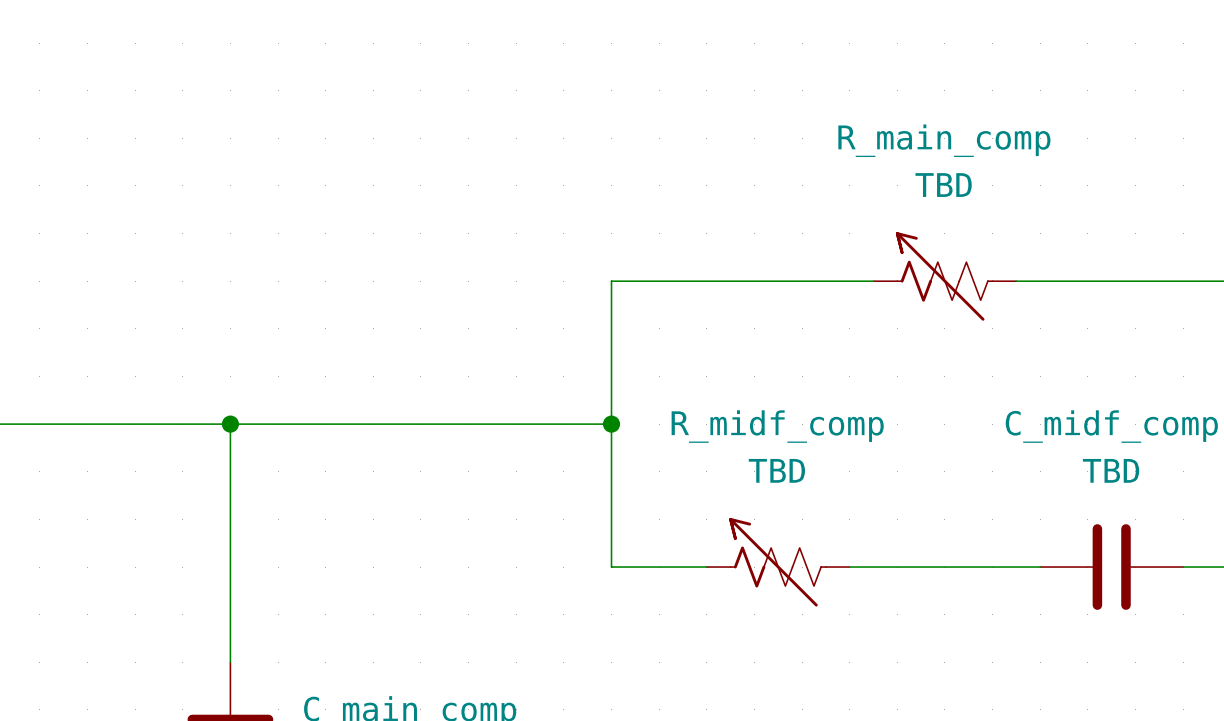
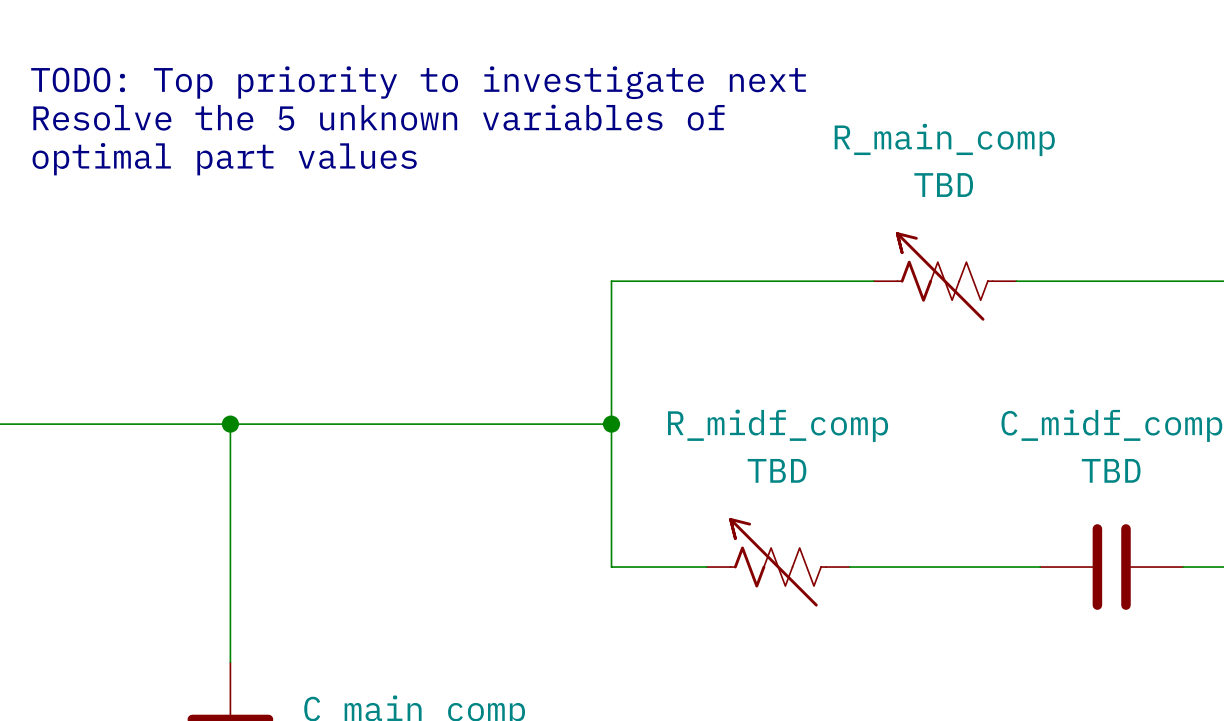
text: none -> TODO: Top priority to investigate next (418, 82)
text: none -> Resolve the 5 unknown variables of (378, 117)
text: none -> optimal part values (224, 159)

